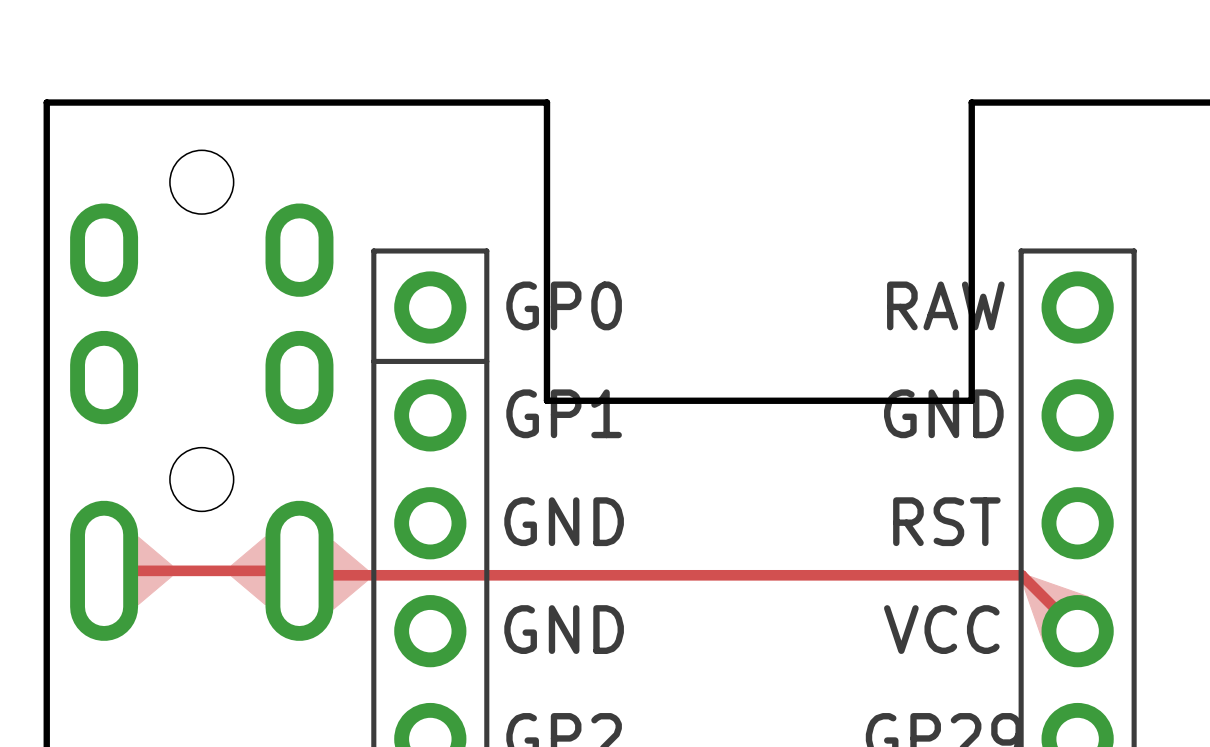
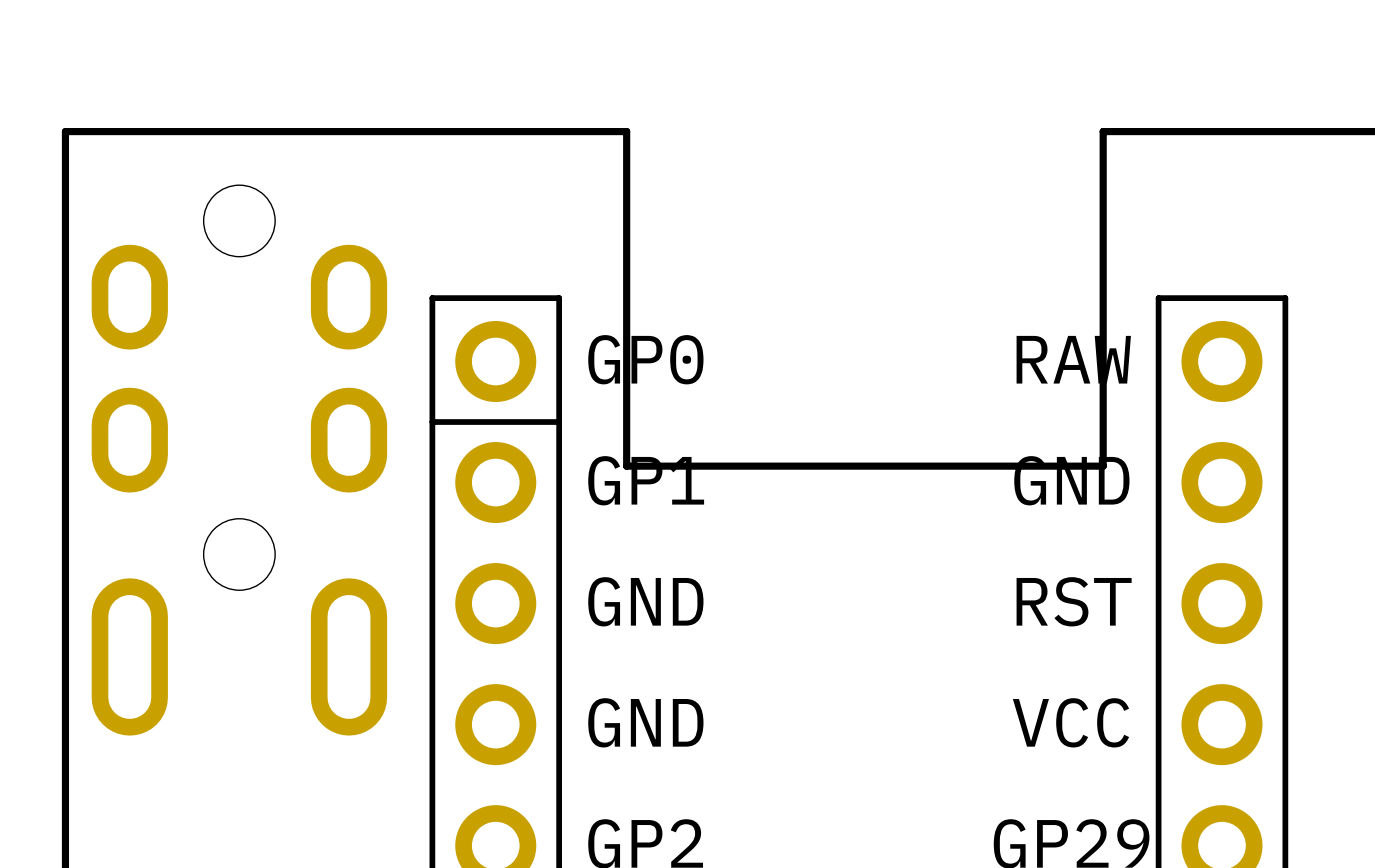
track: (104, 570) (299, 570) -> none
track: (303, 575) (1021, 575) (1077, 631) -> none

